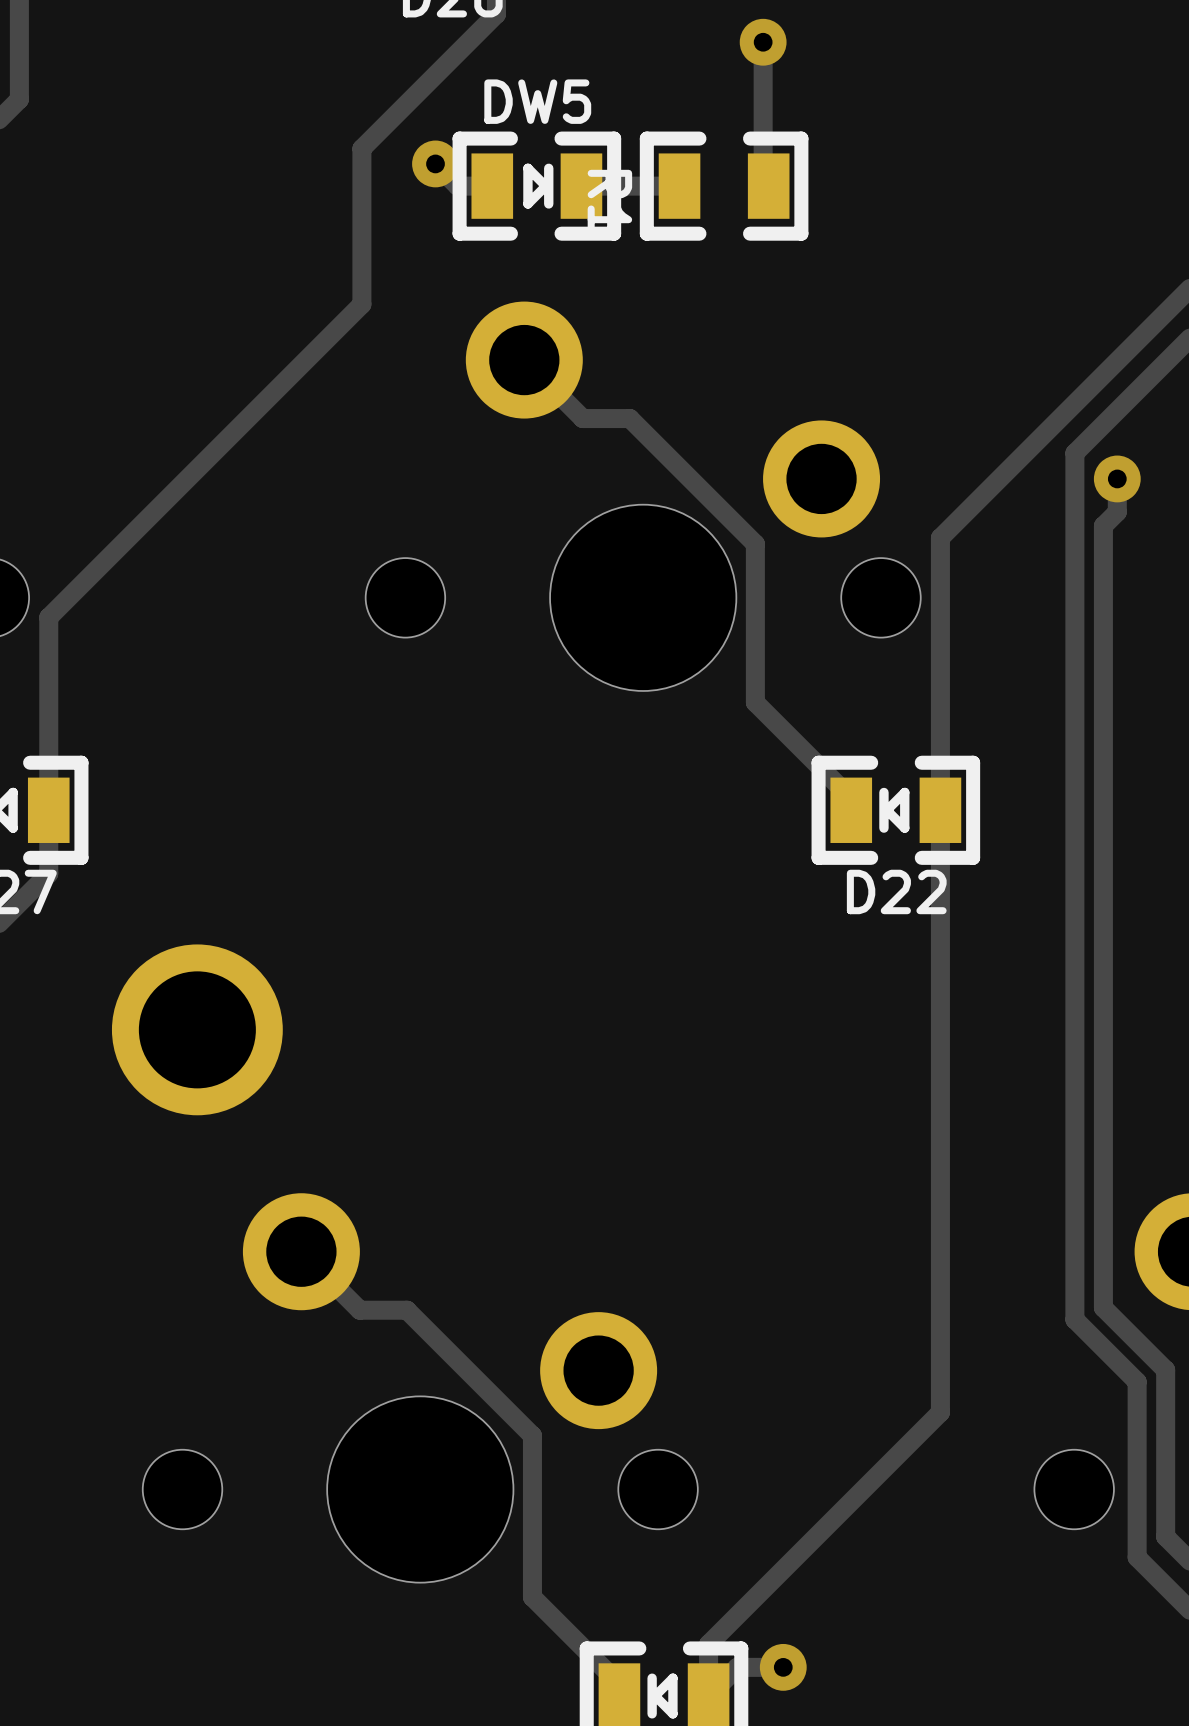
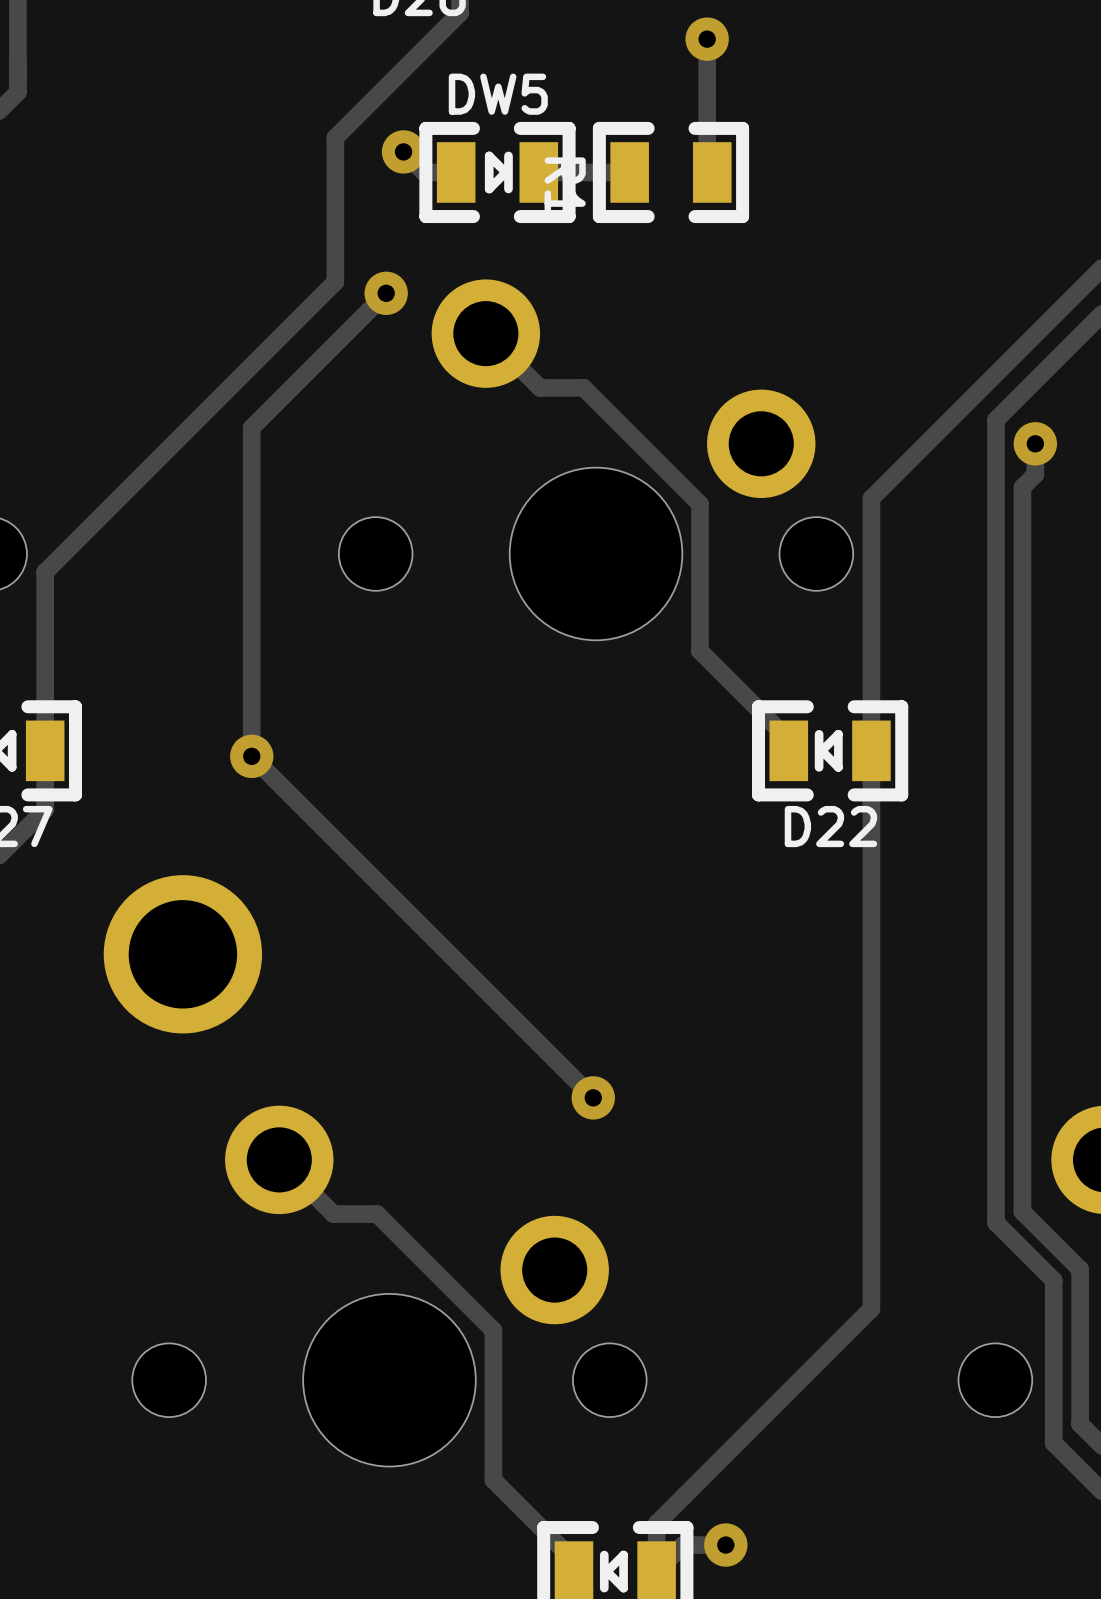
track: none -> (386, 293) (251, 427) (251, 756) (593, 1097)
via: none -> (386, 293)
via: none -> (251, 756)
via: none -> (593, 1097)

